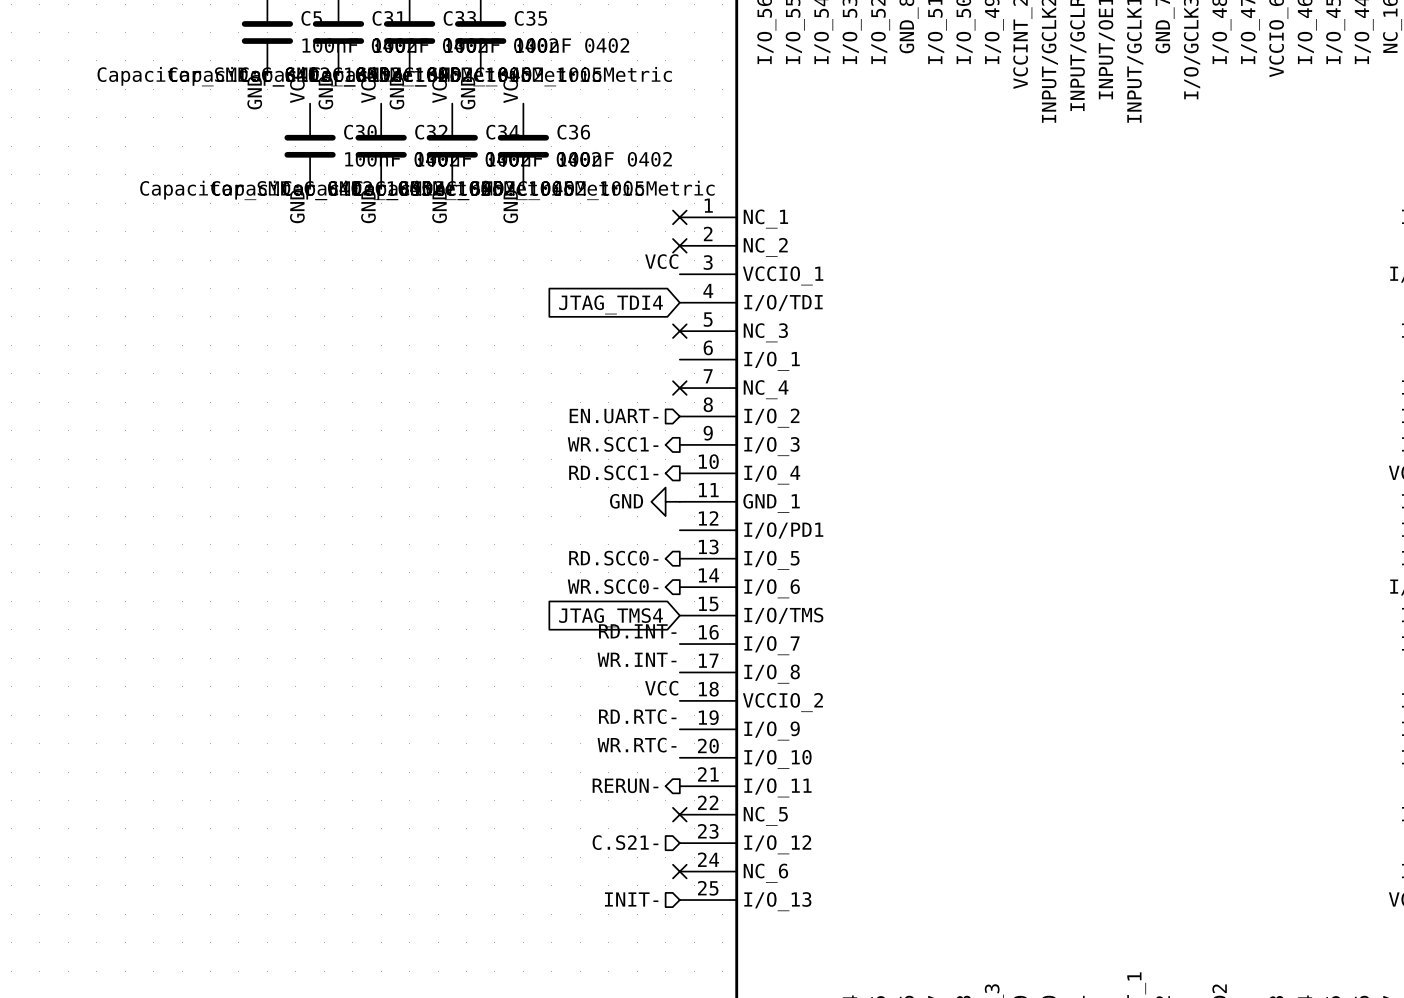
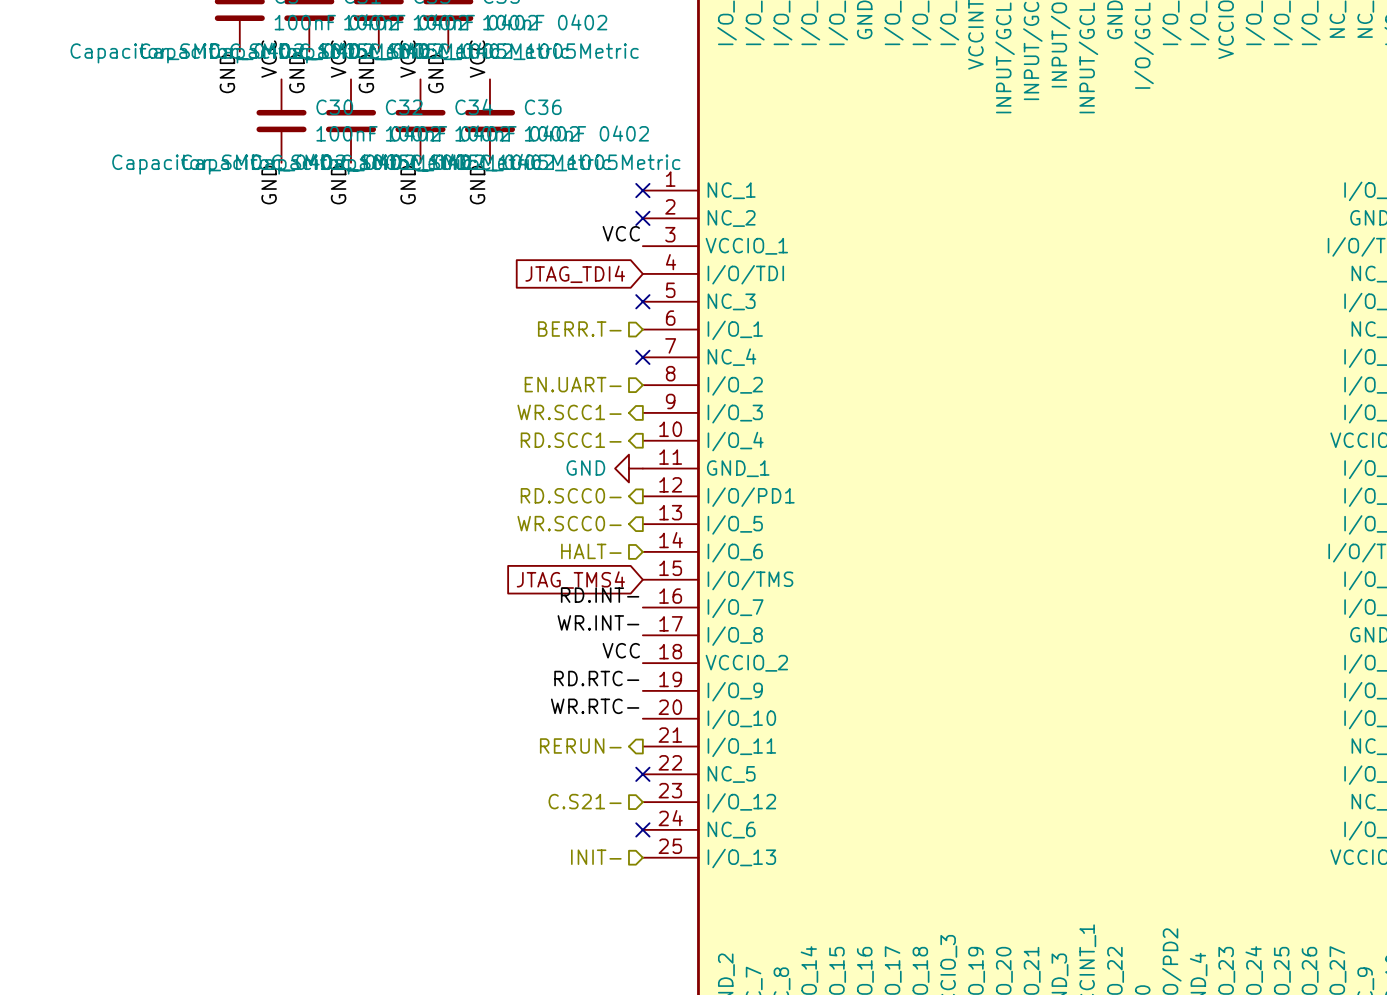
hierarchical label: none -> BERR.T- (579, 329)
hierarchical label: none -> RD.SCC0- (571, 495)
hierarchical label: RD.SCC0- (613, 558) -> WR.SCC0- (569, 523)
hierarchical label shape: output (613, 586) -> input (591, 551)
hierarchical label: WR.SCC0- (613, 586) -> HALT- (591, 551)

